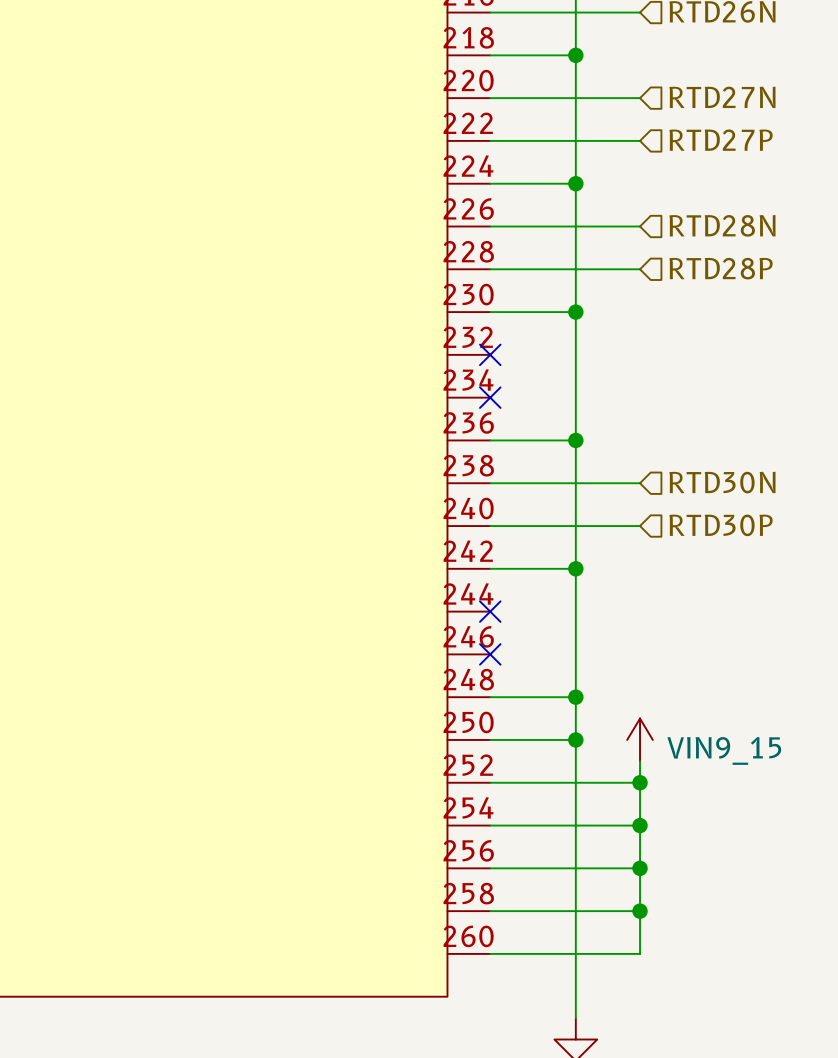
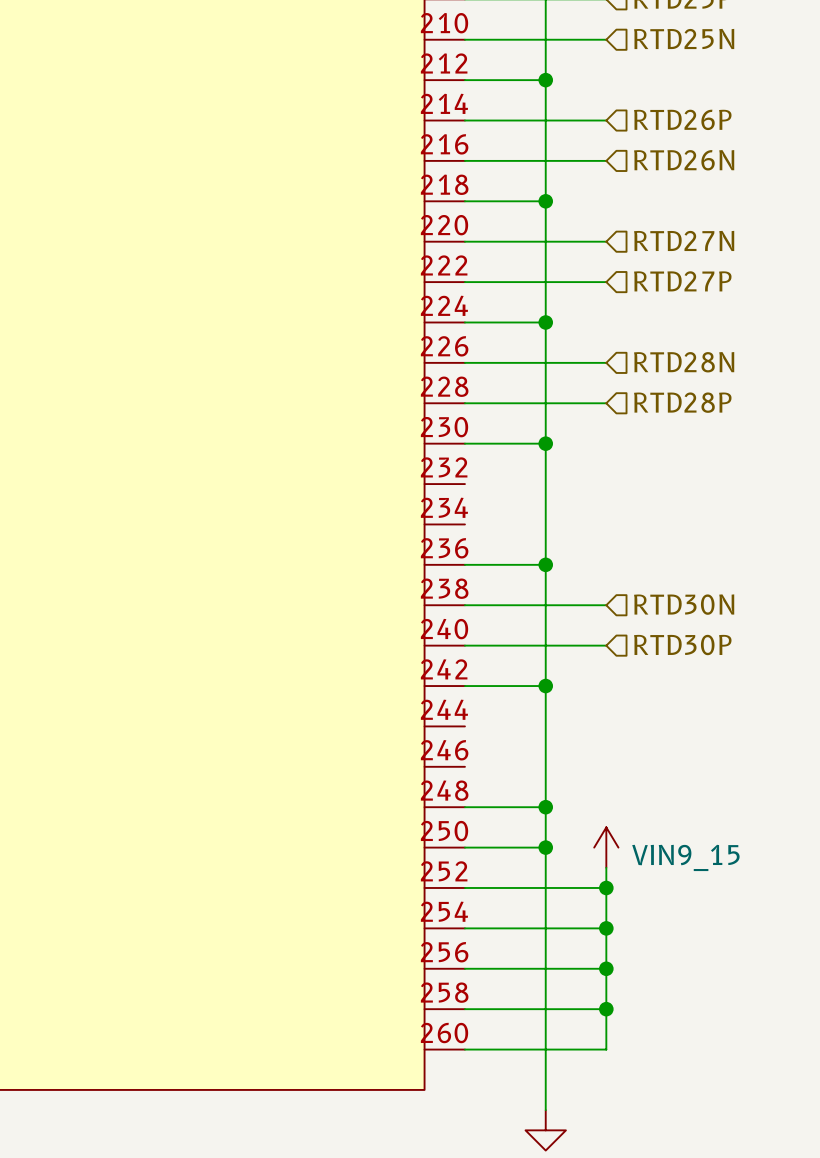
no-connect mark: (490, 354) -> none
no-connect mark: (490, 397) -> none
no-connect mark: (490, 611) -> none
no-connect mark: (490, 654) -> none

